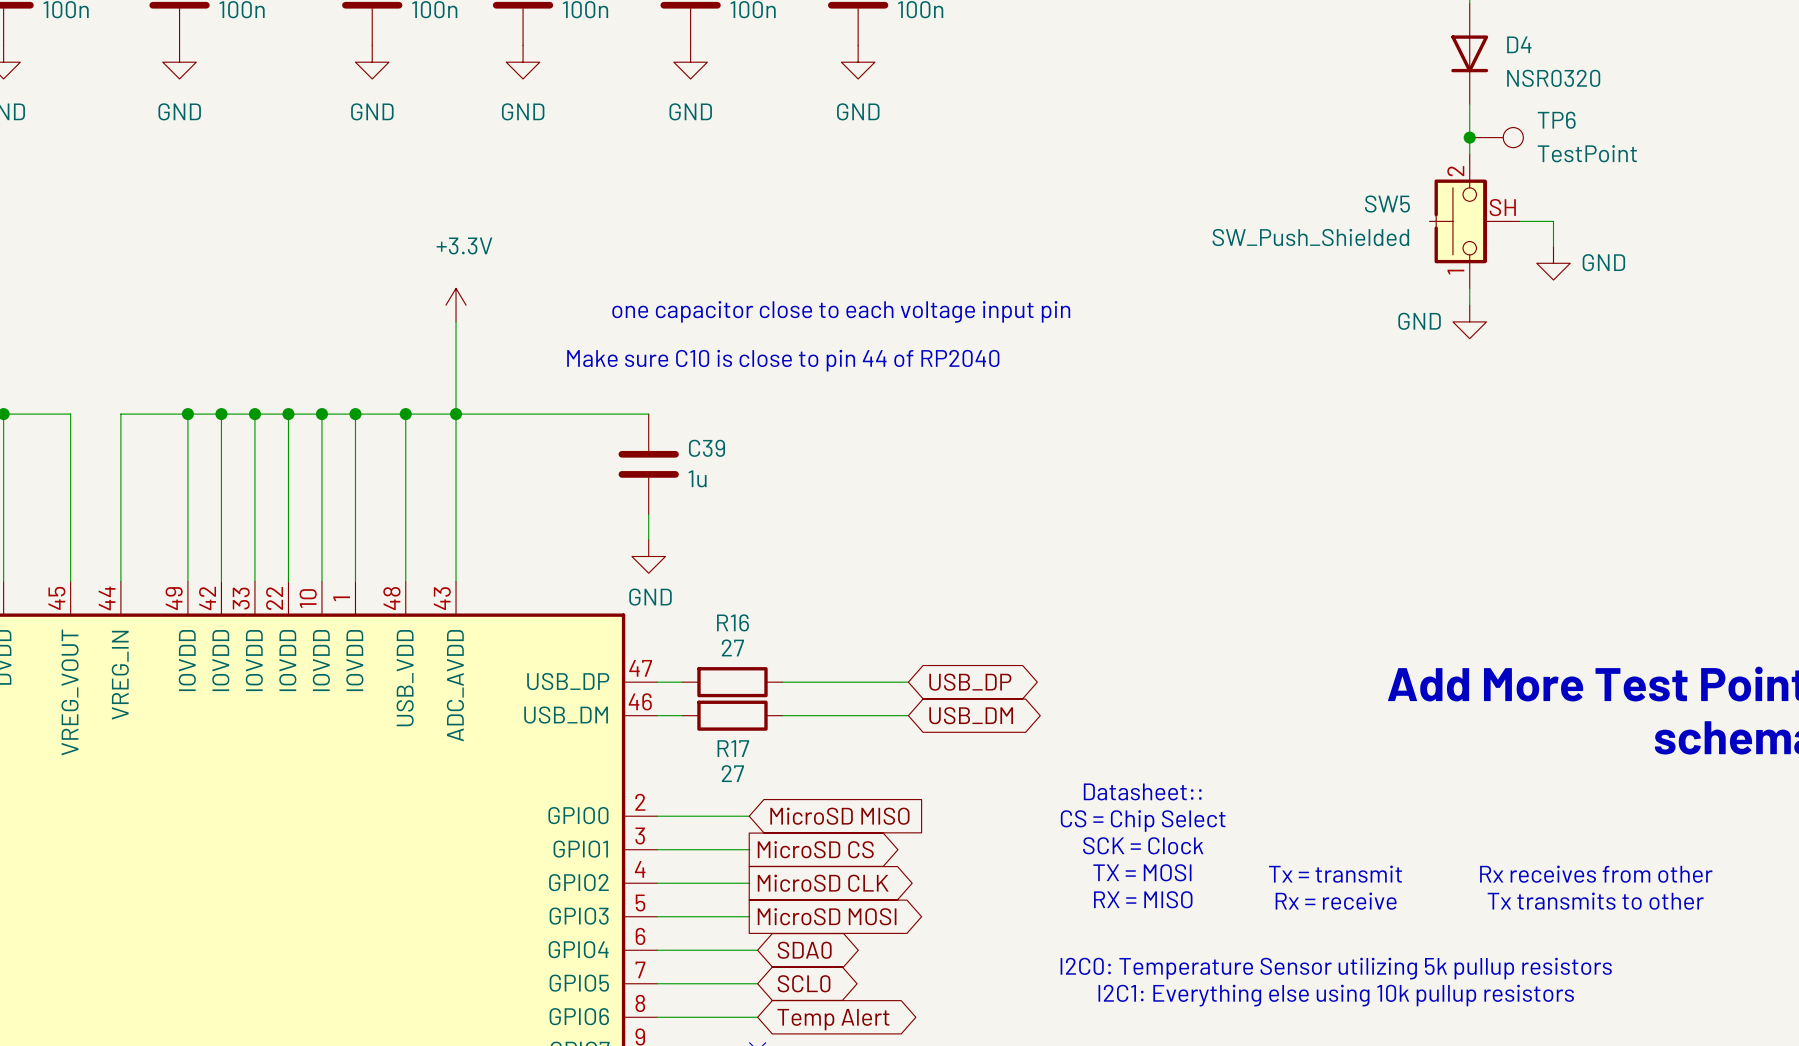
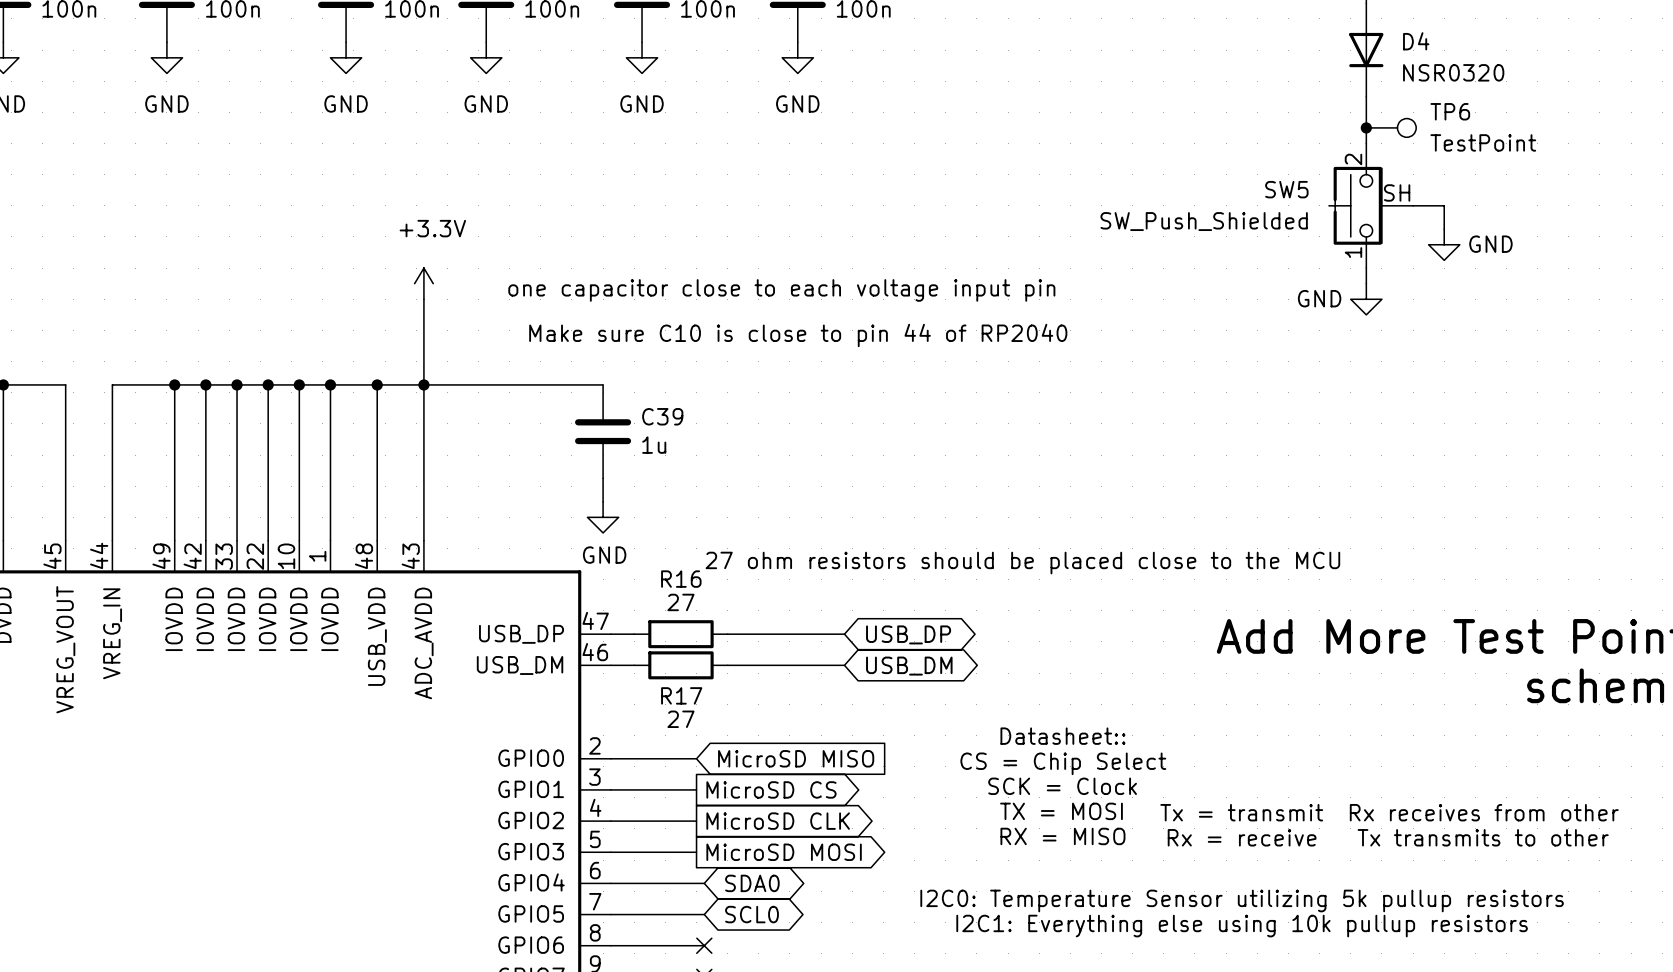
text: none -> 27 ohm resistors should be placed close to the MCU (1022, 563)
no-connect mark: none -> (704, 945)
global label: Temp Alert (833, 1019) -> none

